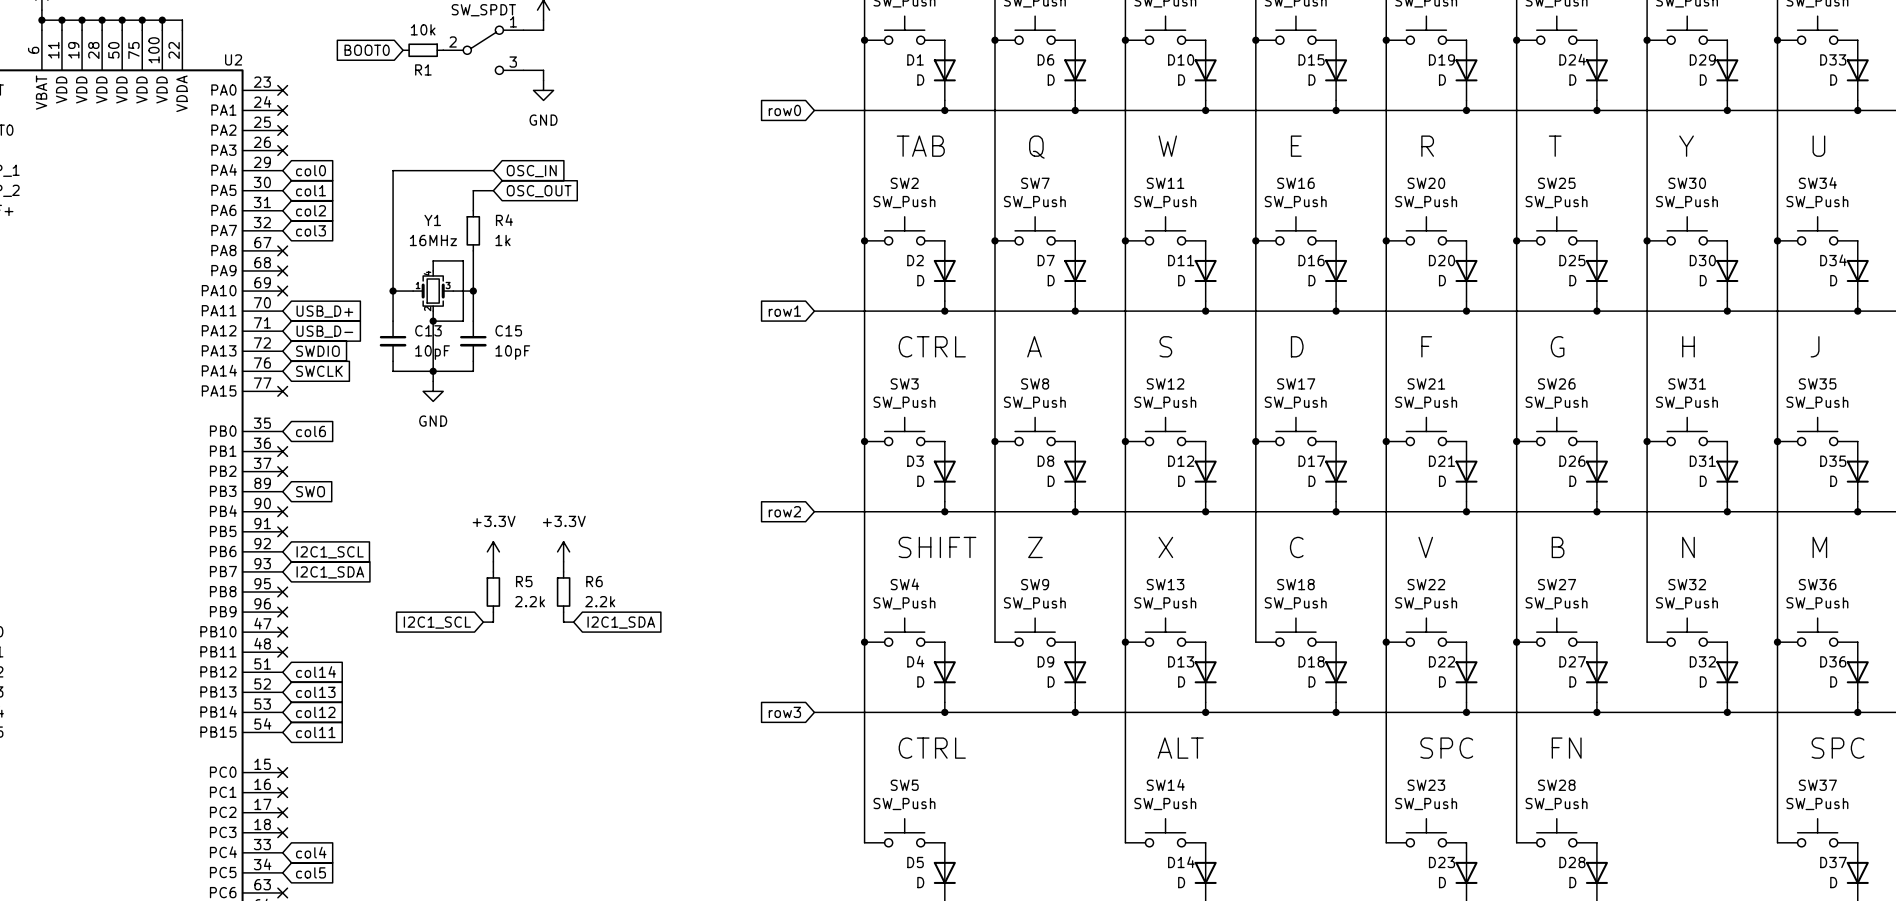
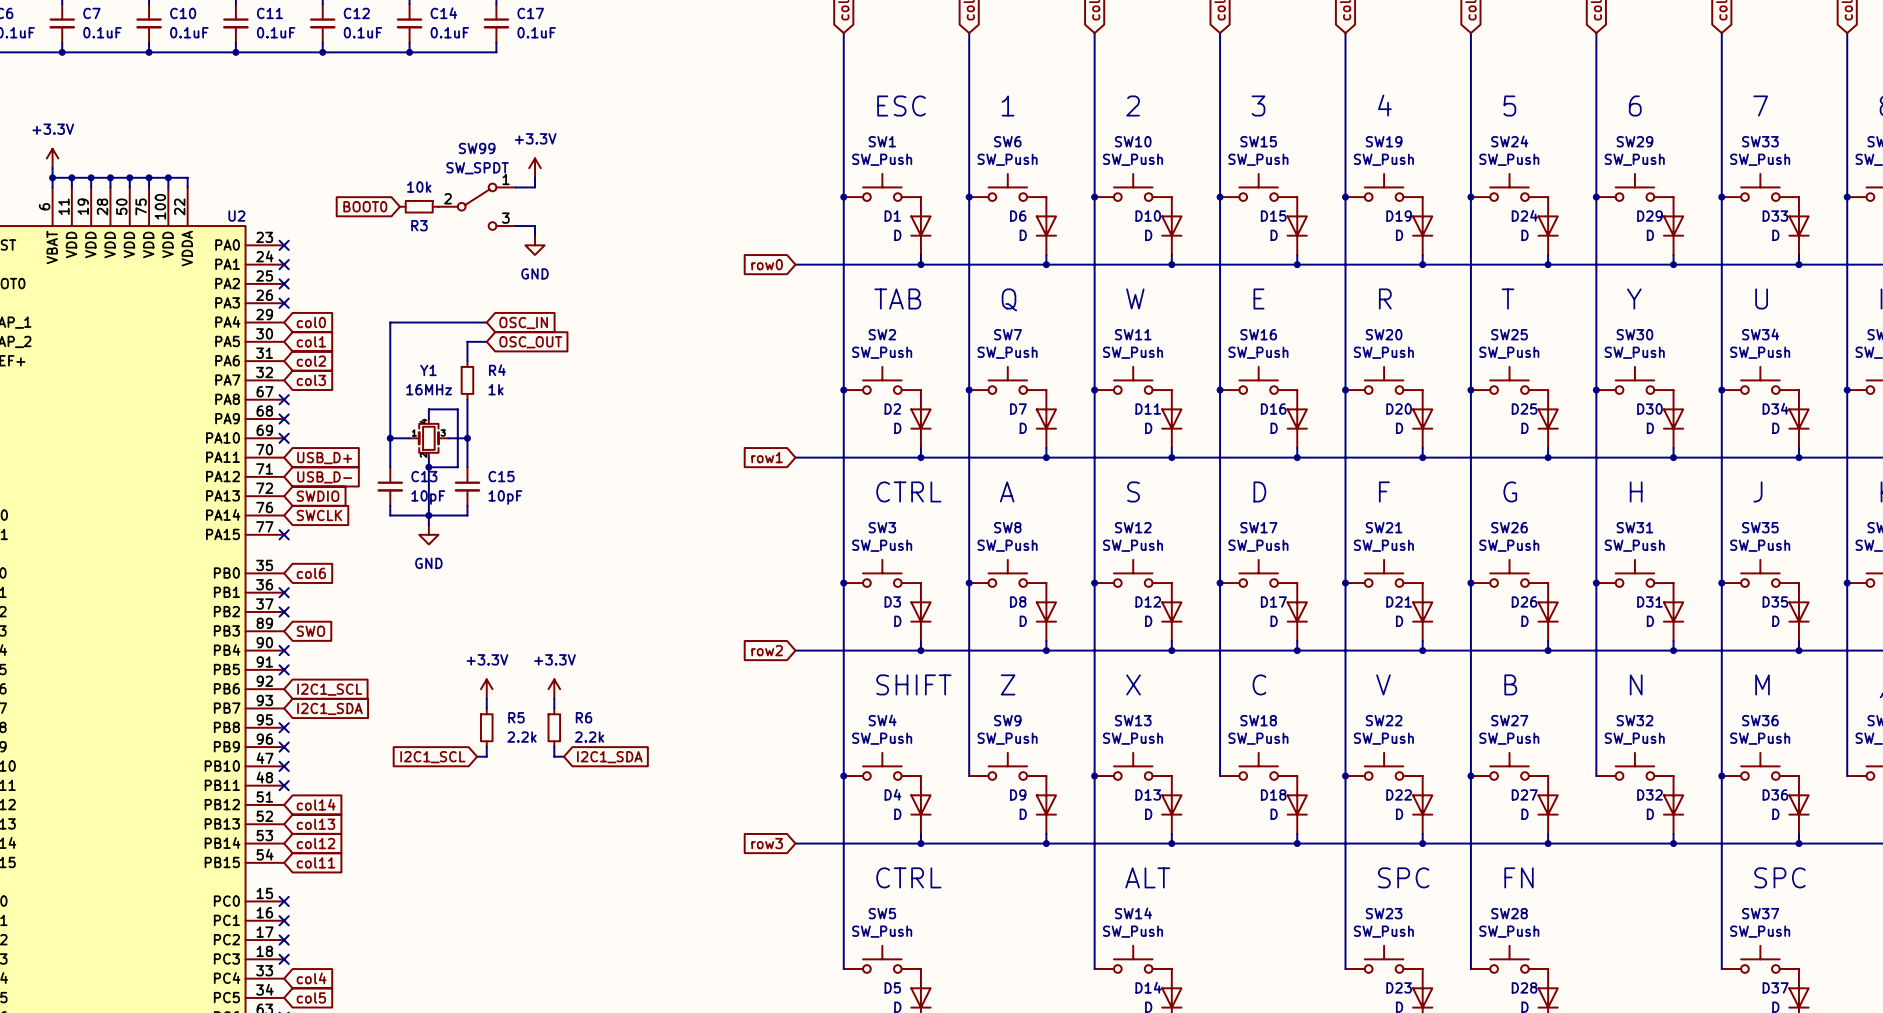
R1 name: R1 (423, 69) -> R3 (419, 225)

